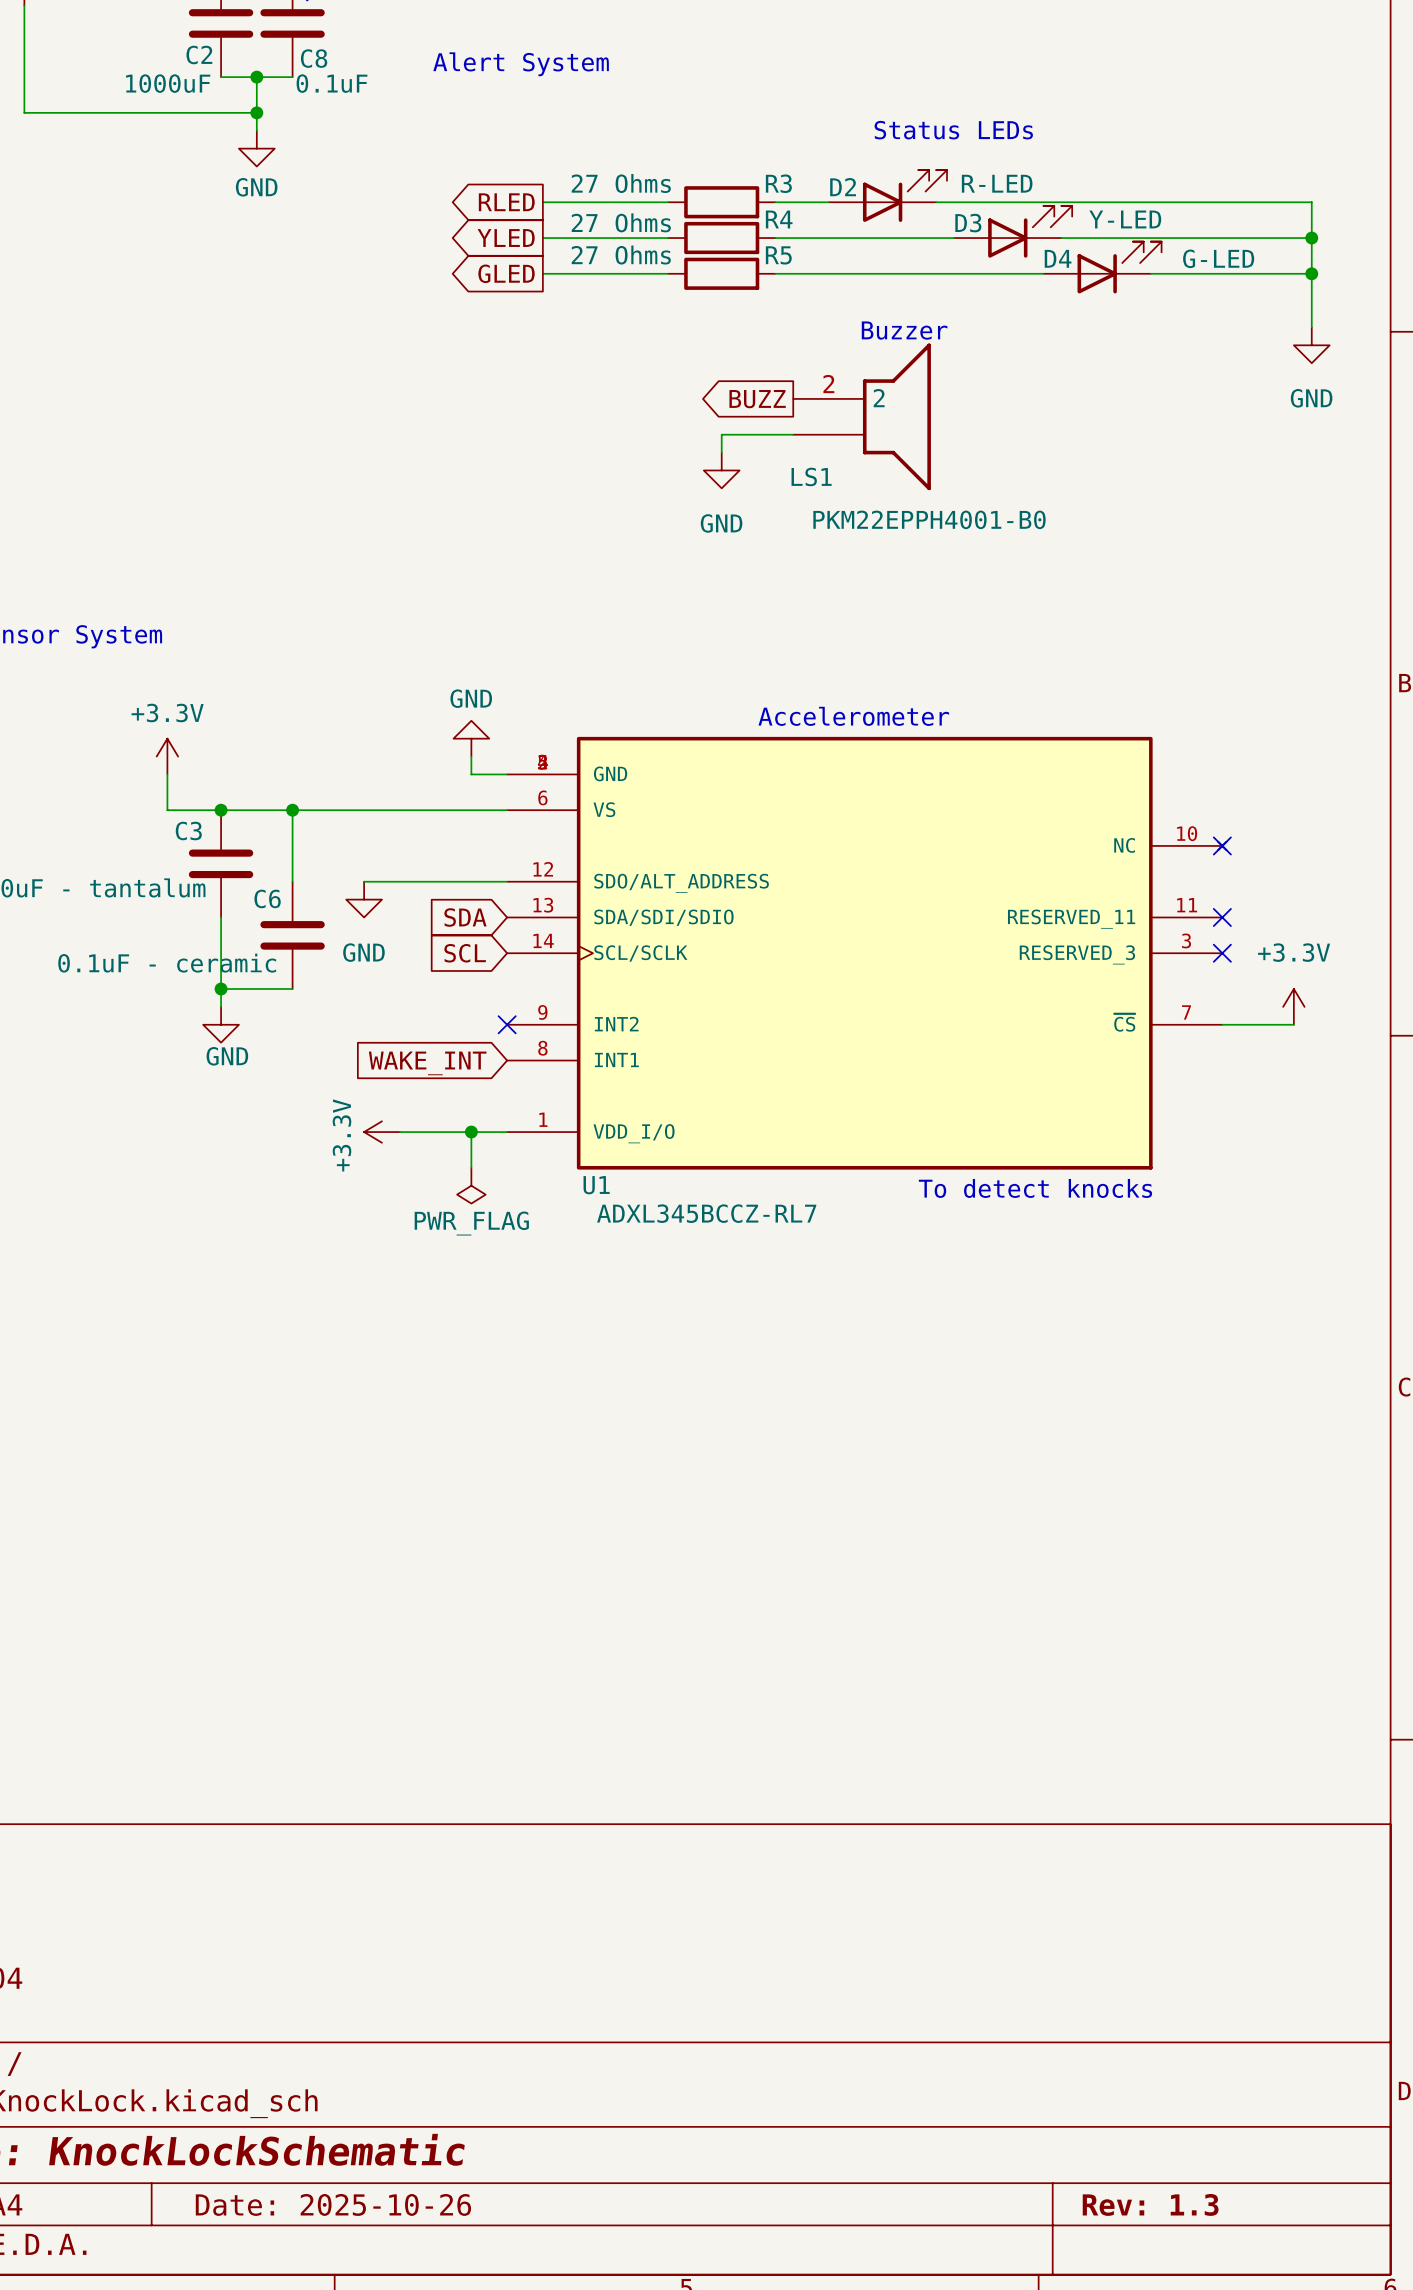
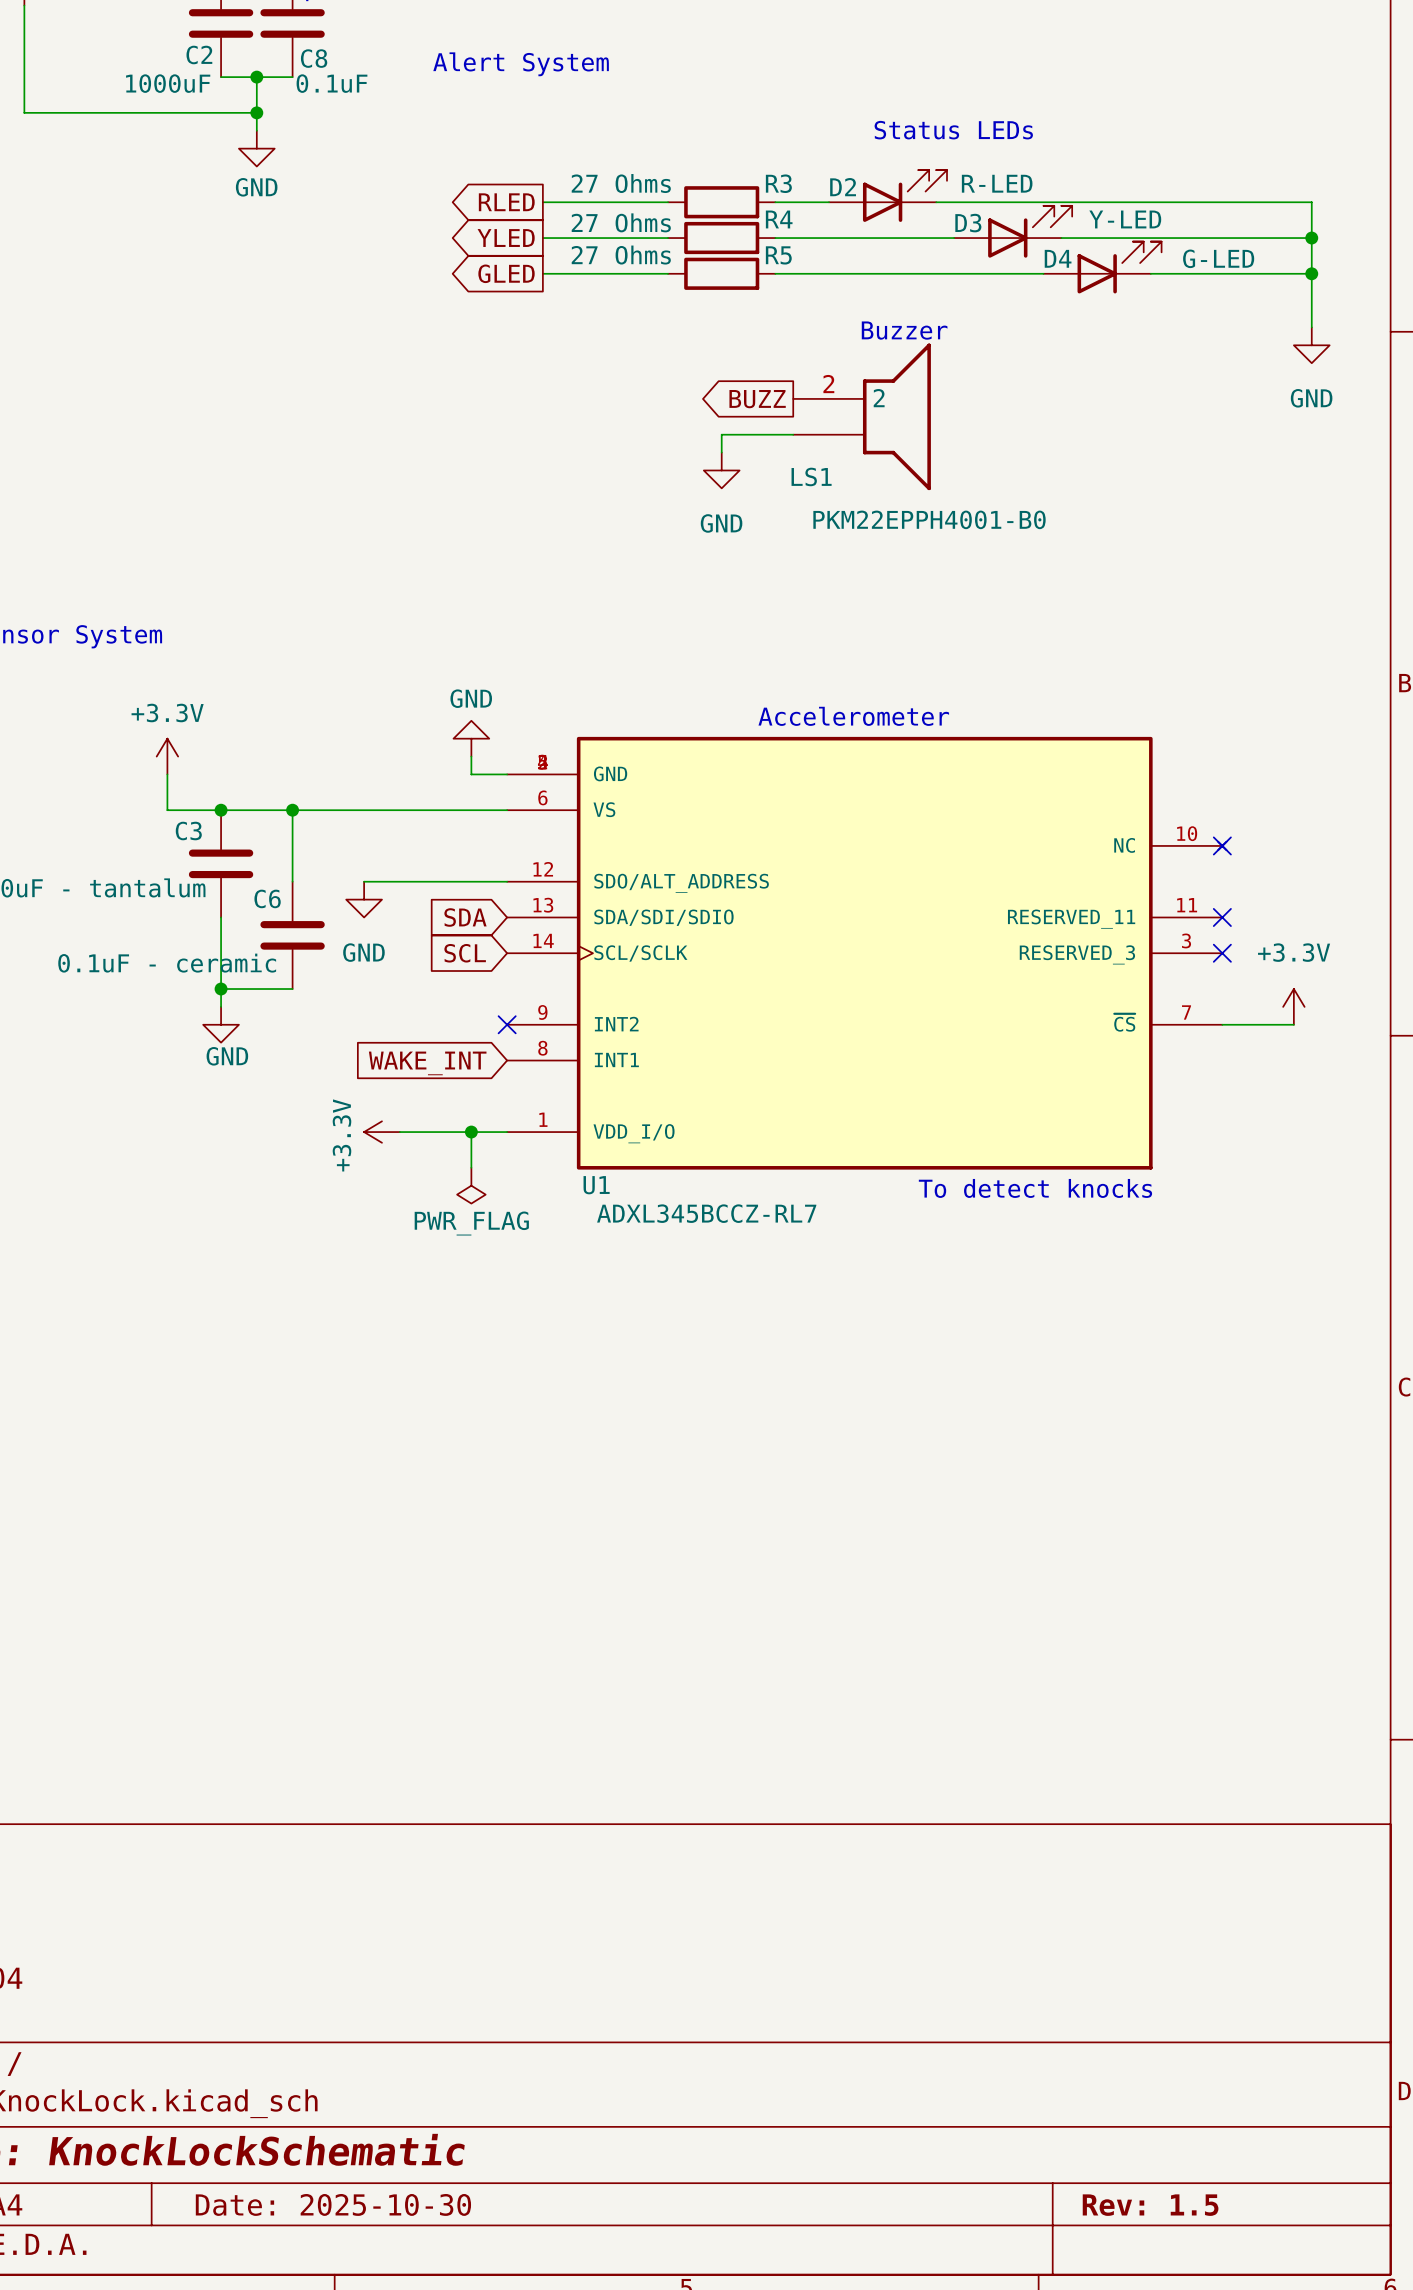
title block: Date: 2025-10-26 (333, 2204) -> Date: 2025-10-30 (333, 2204)
title block: Rev: 1.3 (1150, 2204) -> Rev: 1.5 (1150, 2205)

